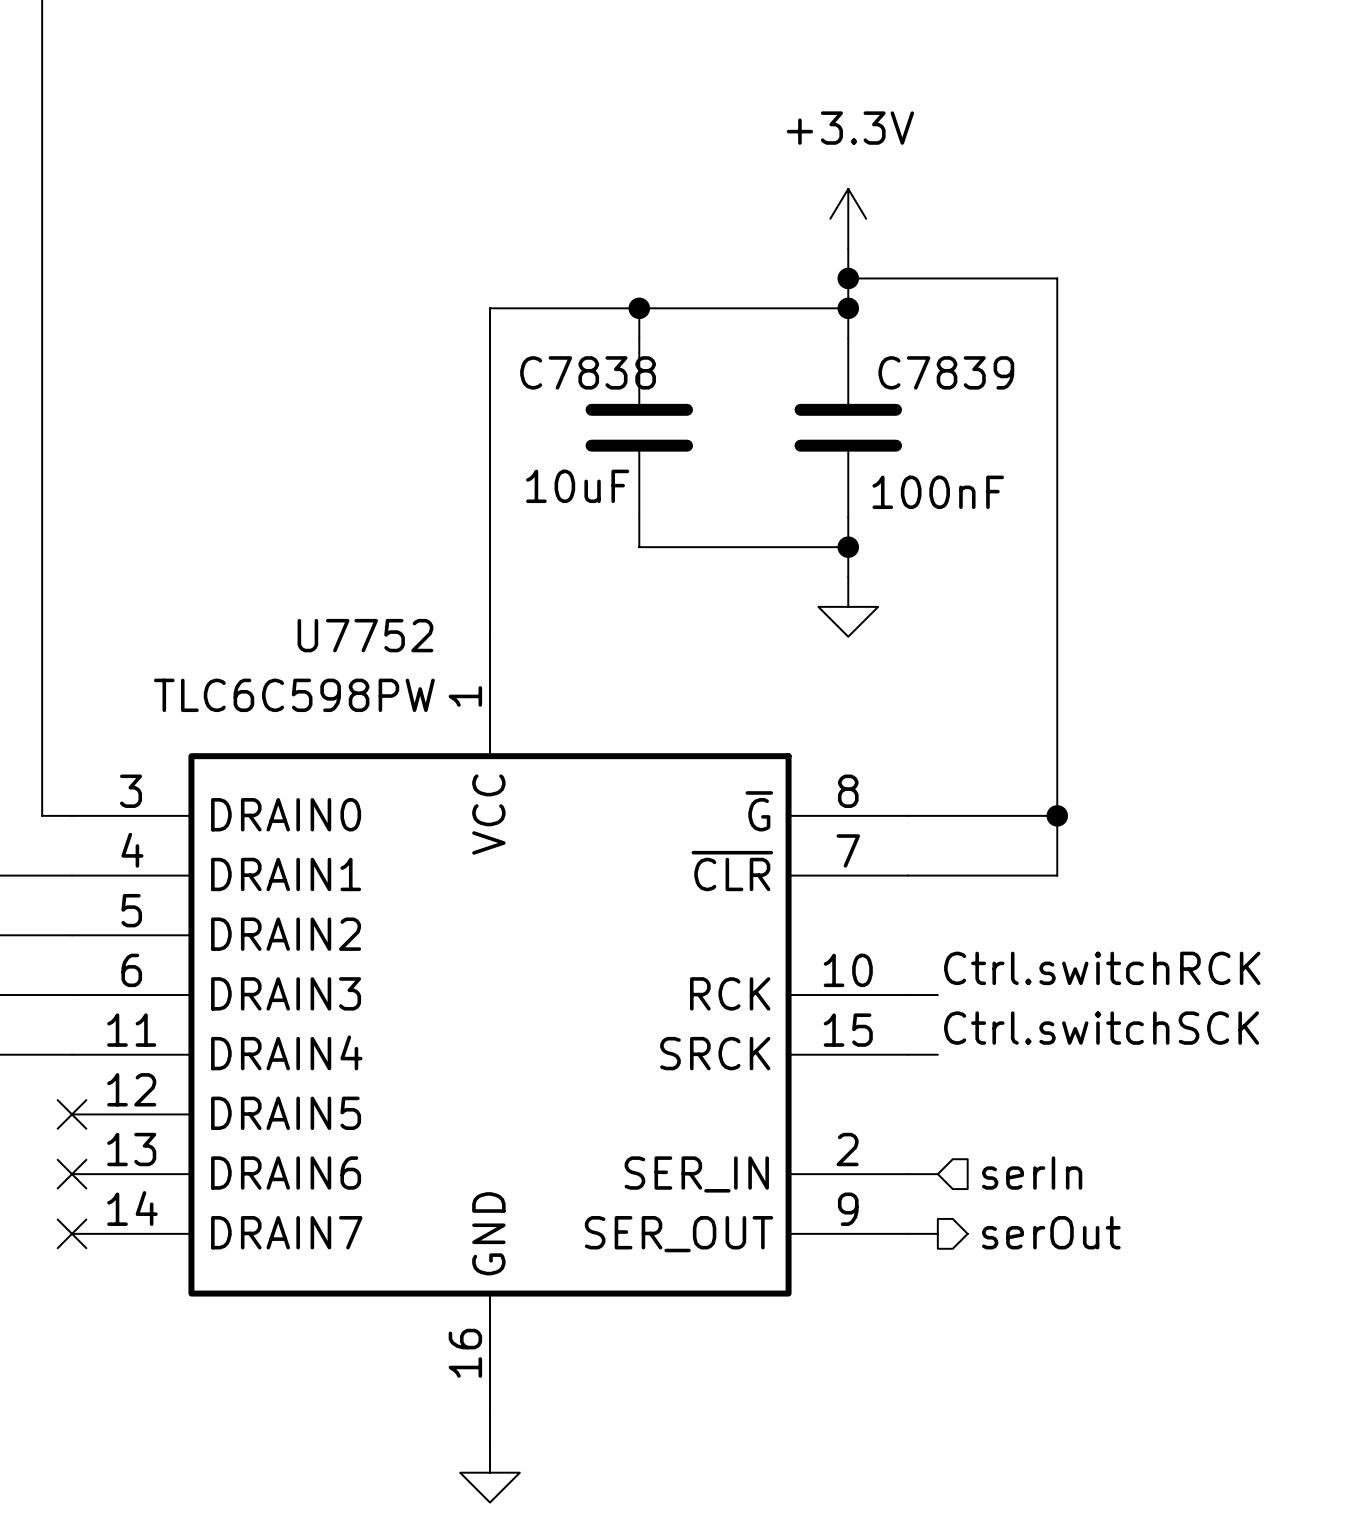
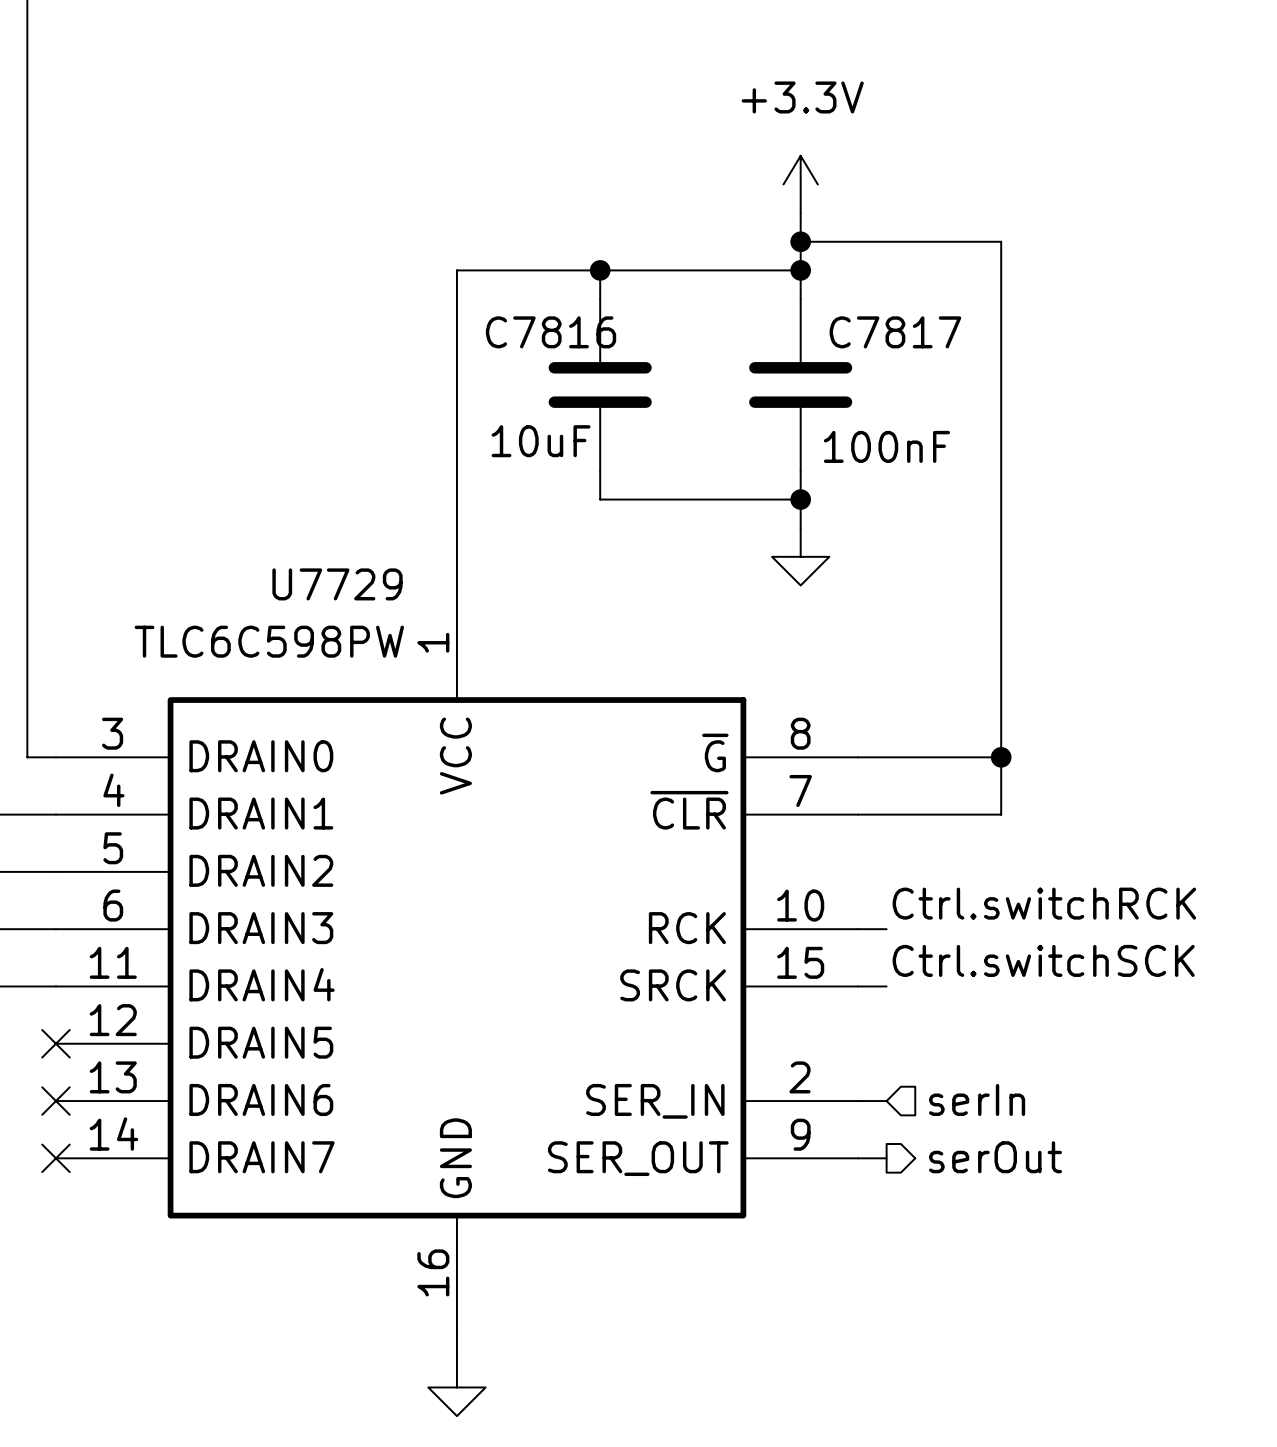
C7838 name: C7838 (588, 372) -> C7816 (551, 332)
C7839 name: C7839 (946, 372) -> C7817 (895, 332)
U7752 name: U7752 (365, 635) -> U7729 (337, 584)

